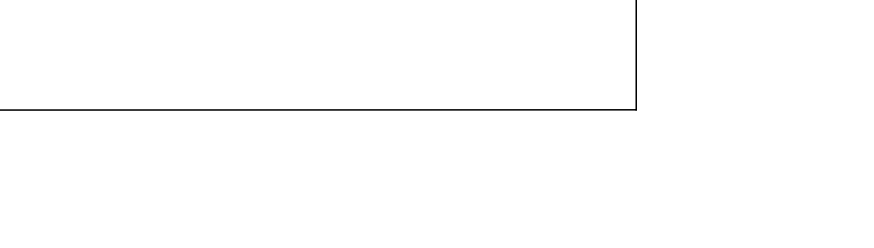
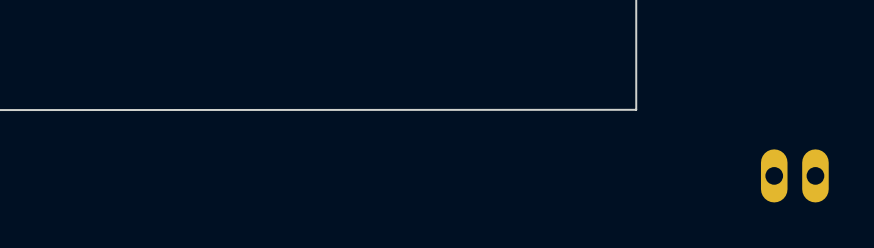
part: none -> (794, 175)

